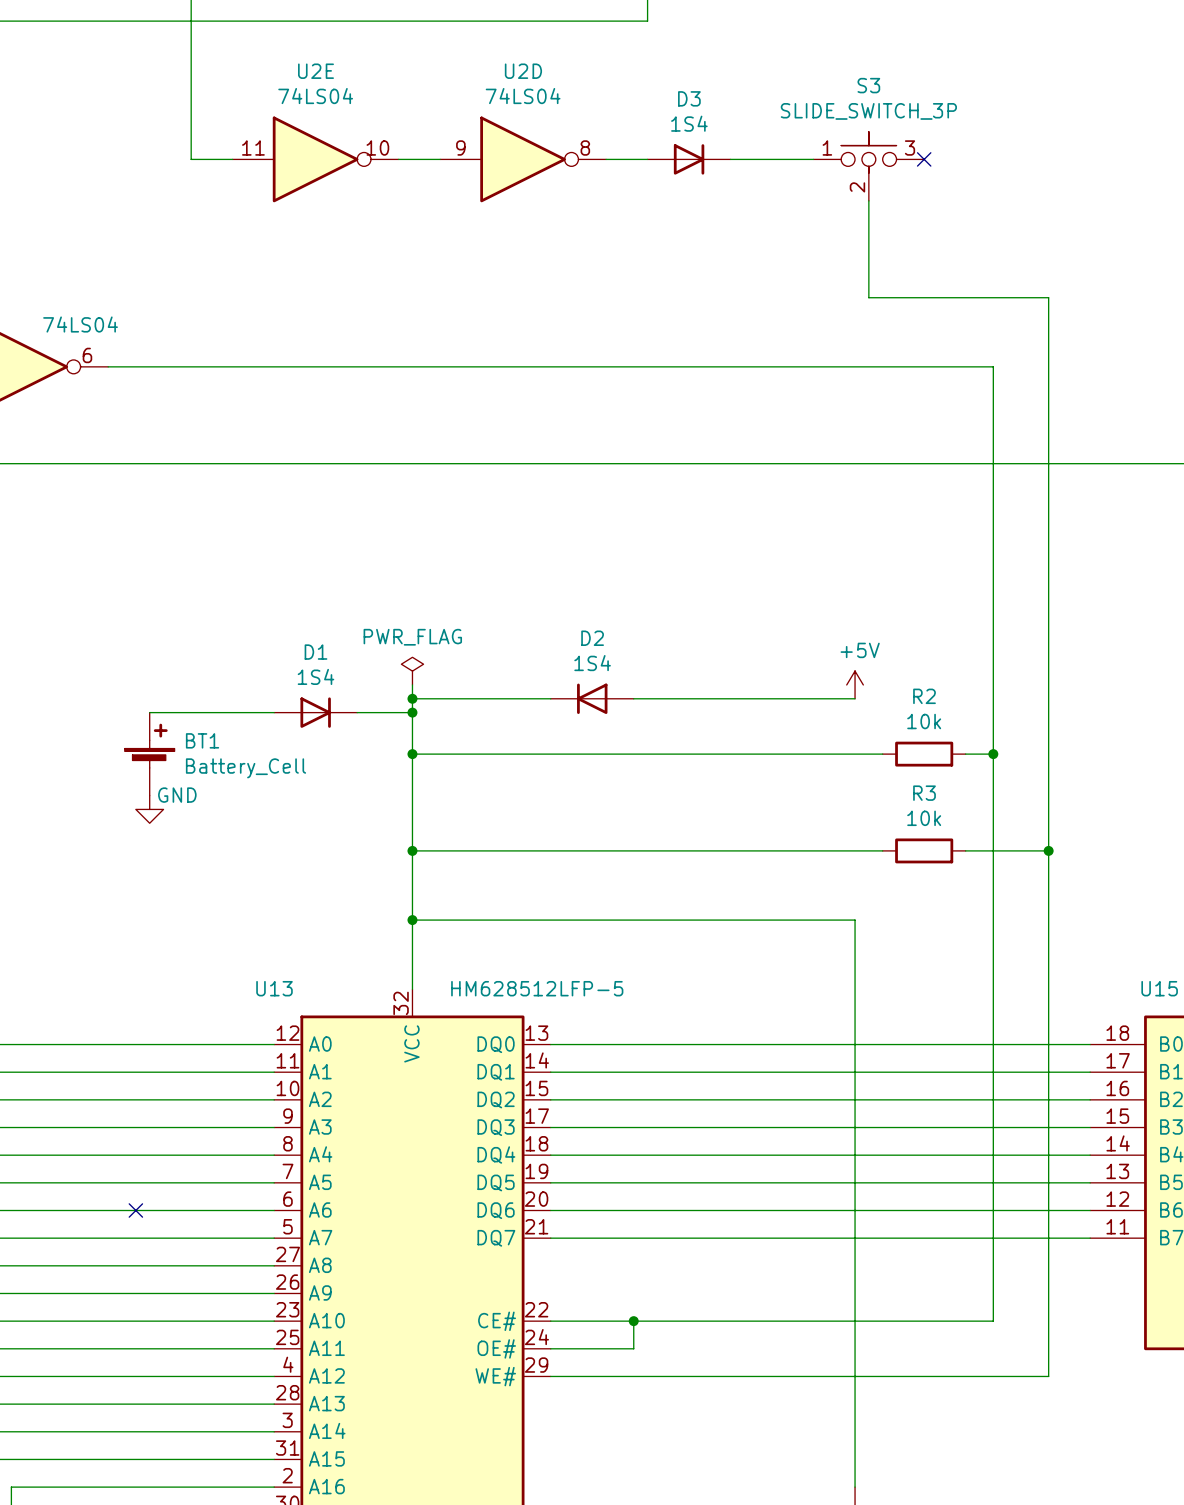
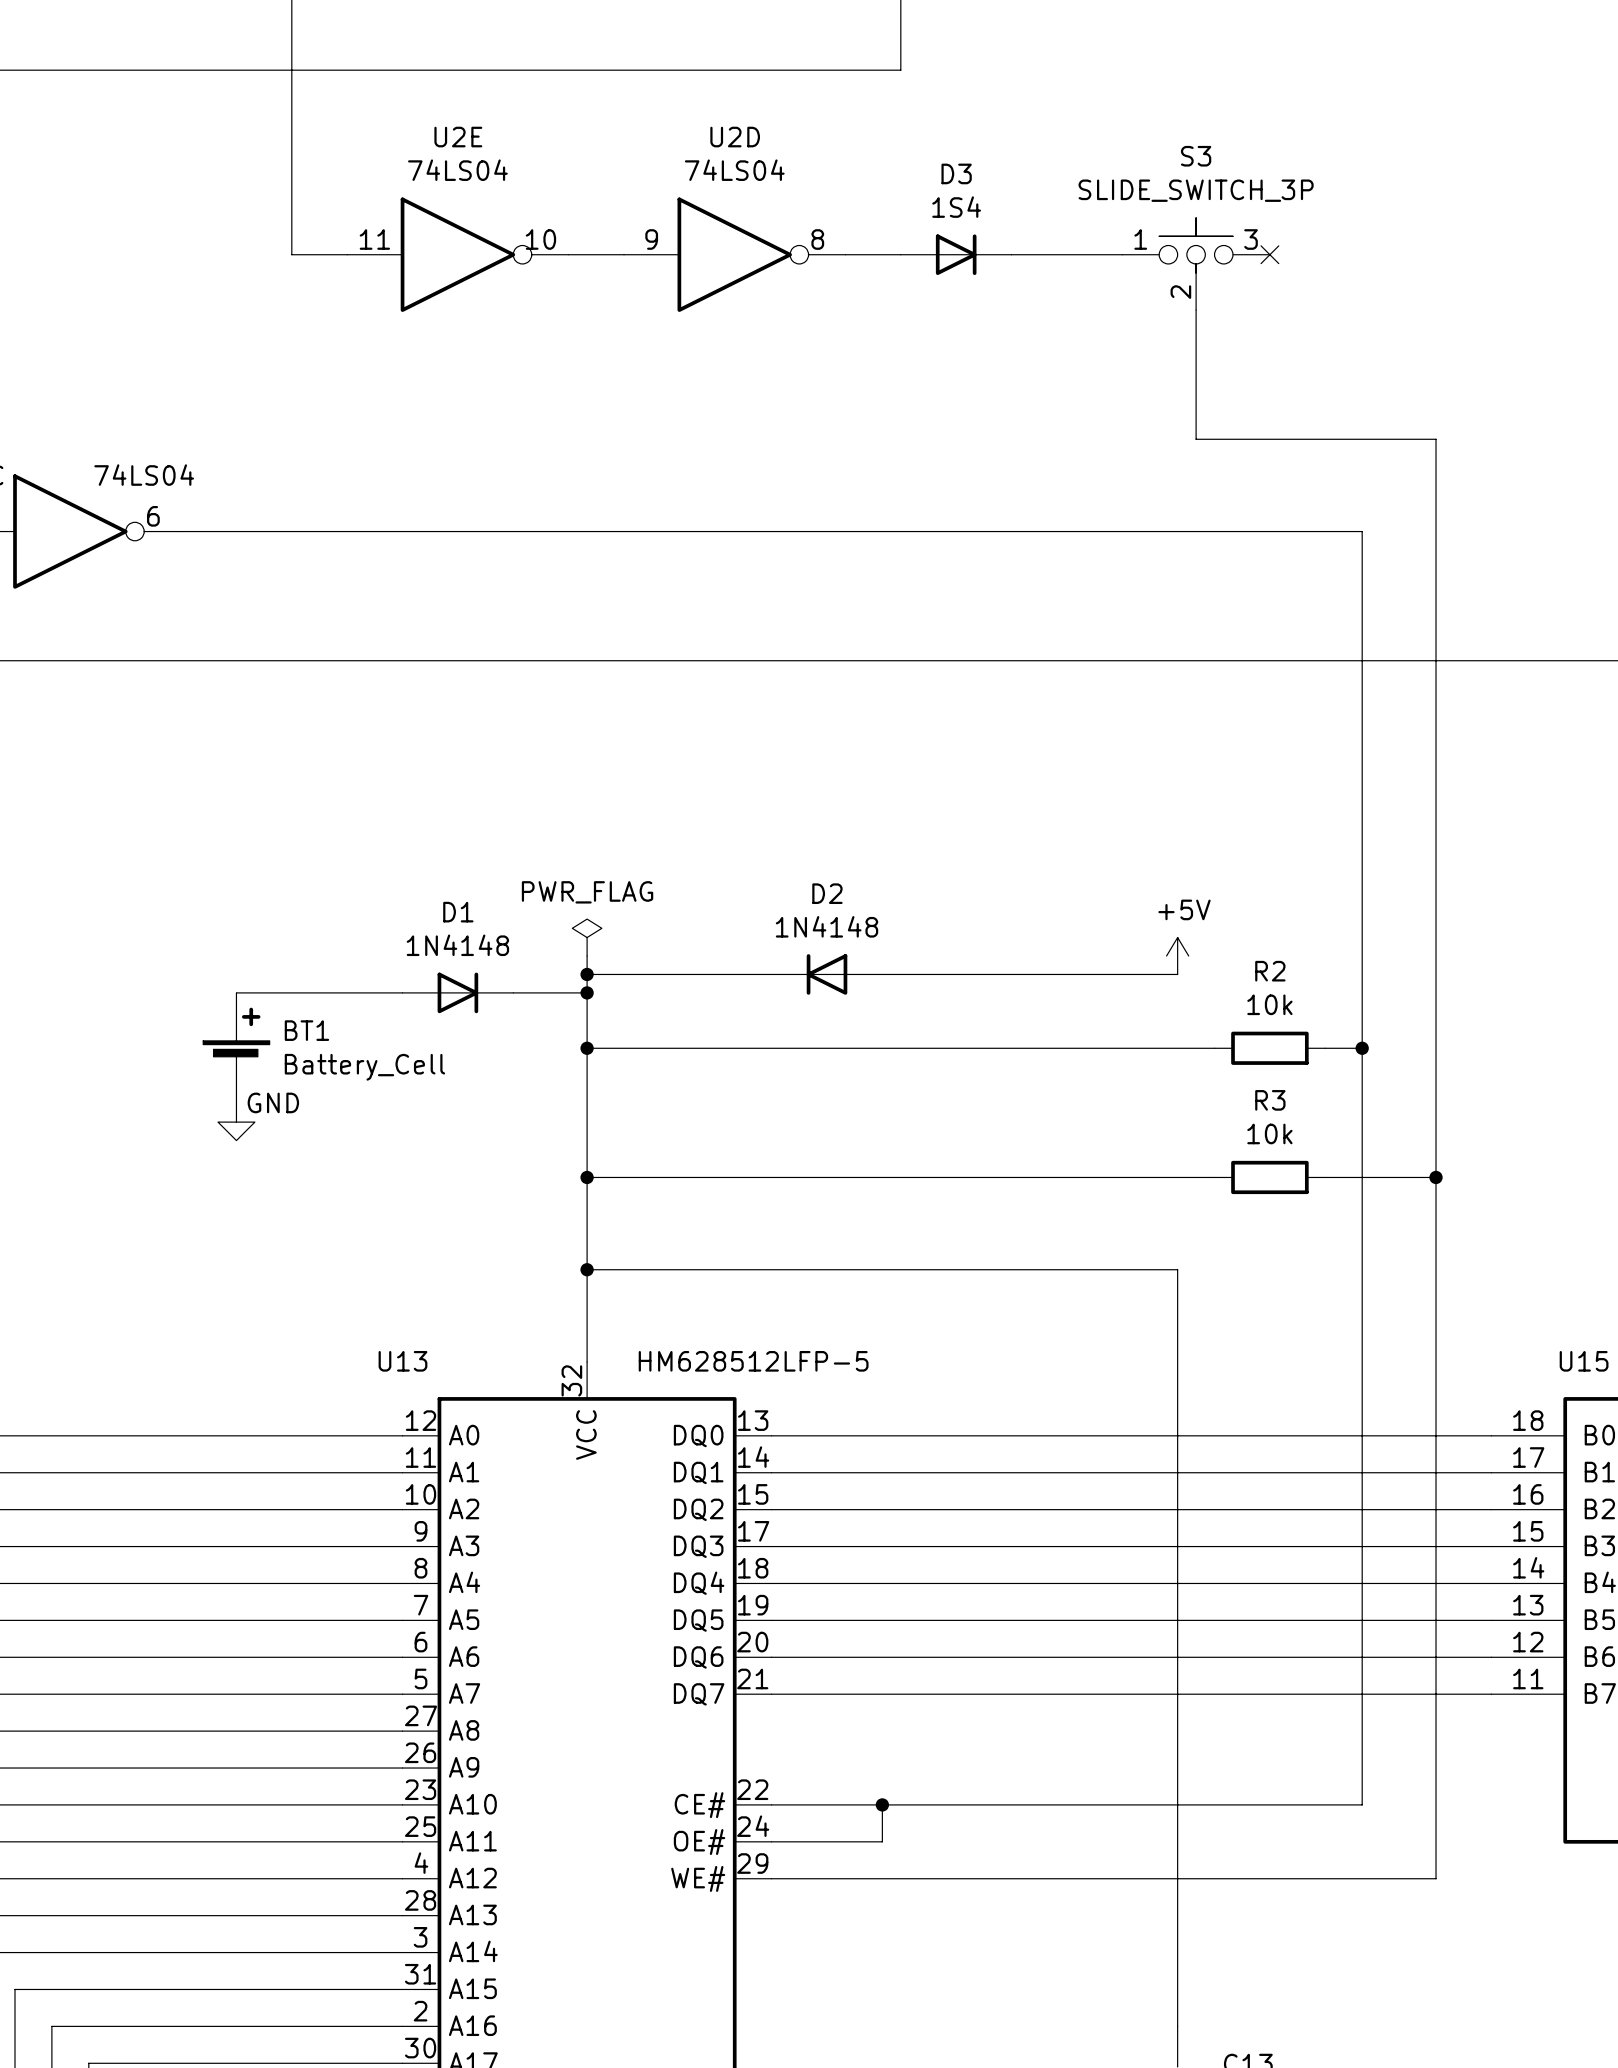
D2 value: 1S4 (592, 663) -> 1N4148 (827, 926)
D1 value: 1S4 (315, 676) -> 1N4148 (457, 945)
no-connect mark: (135, 1210) -> none

